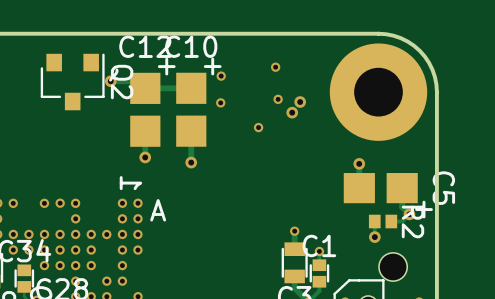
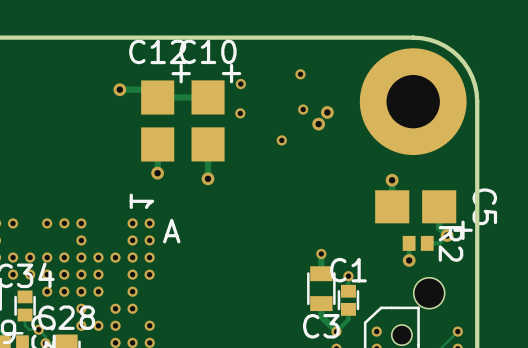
Q2: (72, 81) -> none

